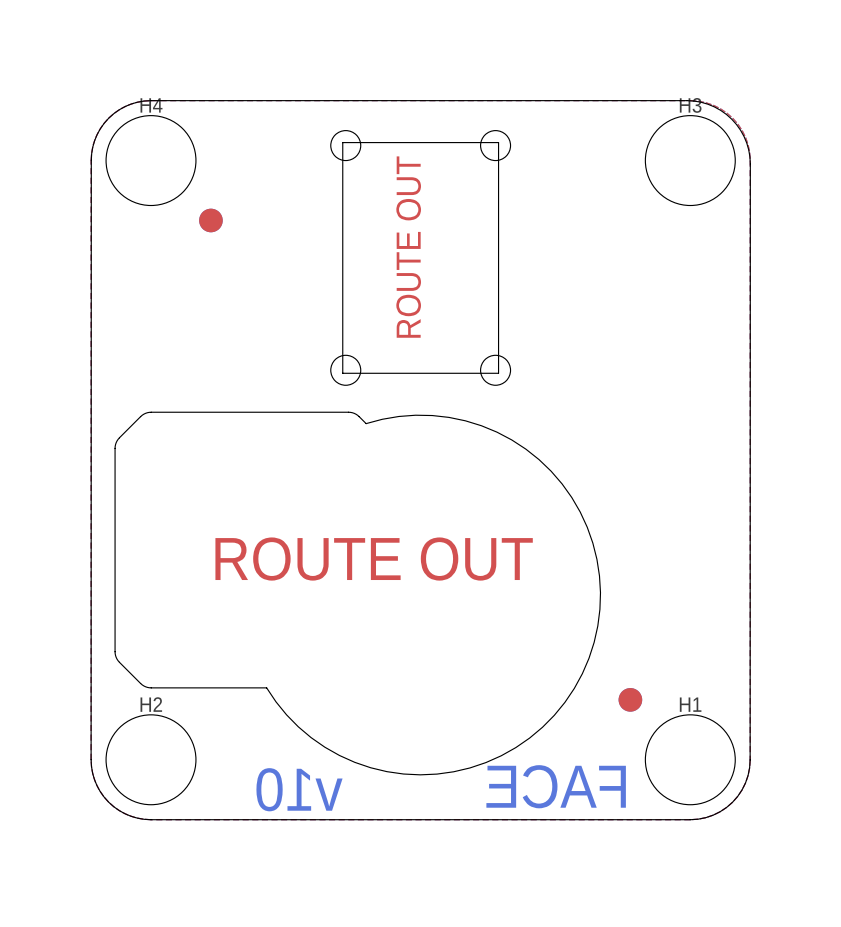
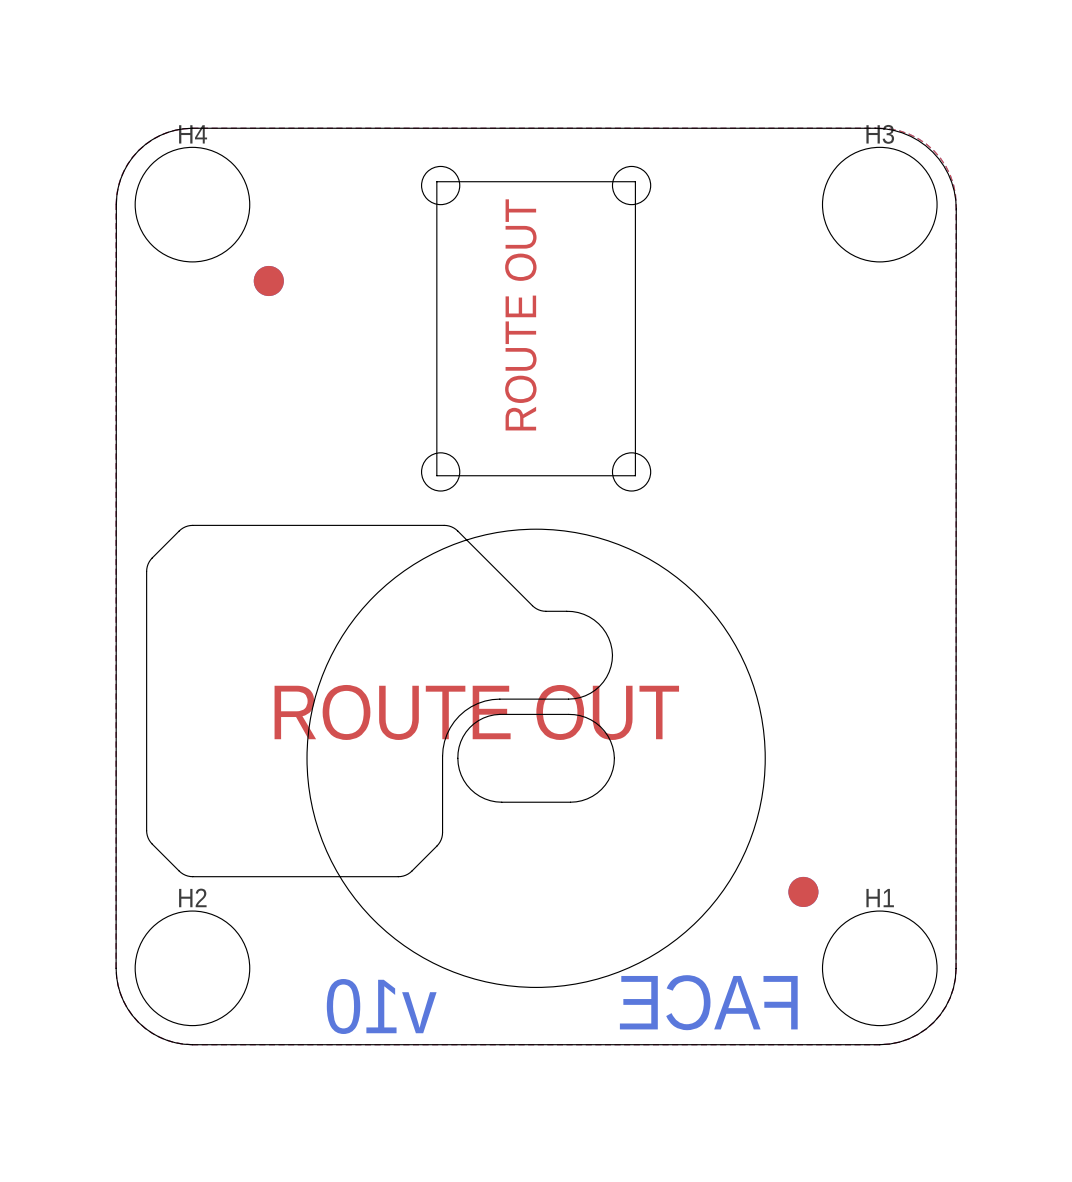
round board edge: none -> [306, 528, 766, 988]
board edge: (366, 423) (398, 416) (415, 415) (449, 417) (465, 420) (481, 425) (511, 439) (525, 449) (551, 471) (571, 497) (580, 512) (592, 543) (596, 559) (600, 592) (599, 609) (597, 626) (588, 658) (574, 688) (564, 702) (554, 715) (529, 738) (515, 747) (485, 762) (470, 767) (437, 774) (403, 774) (386, 771) (354, 762) (339, 755) (311, 737) (298, 726) (275, 701) (266, 687) -> (466, 539) (536, 608) (543, 611) (578, 612) (589, 616) (598, 623) (608, 638) (611, 649) (612, 660) (609, 672) (595, 690) (579, 697) (492, 699) (477, 703) (464, 710) (450, 727) (443, 748) (442, 832) (438, 844) (411, 871) (403, 876) (339, 876)
board edge: none -> (499, 714) (574, 714) (591, 719) (604, 731) (612, 746) (614, 764) (608, 780) (597, 793) (576, 801) (501, 802) (479, 796) (466, 785) (461, 775) (458, 764) (459, 747) (463, 736) (473, 723) (488, 716) (499, 714)

